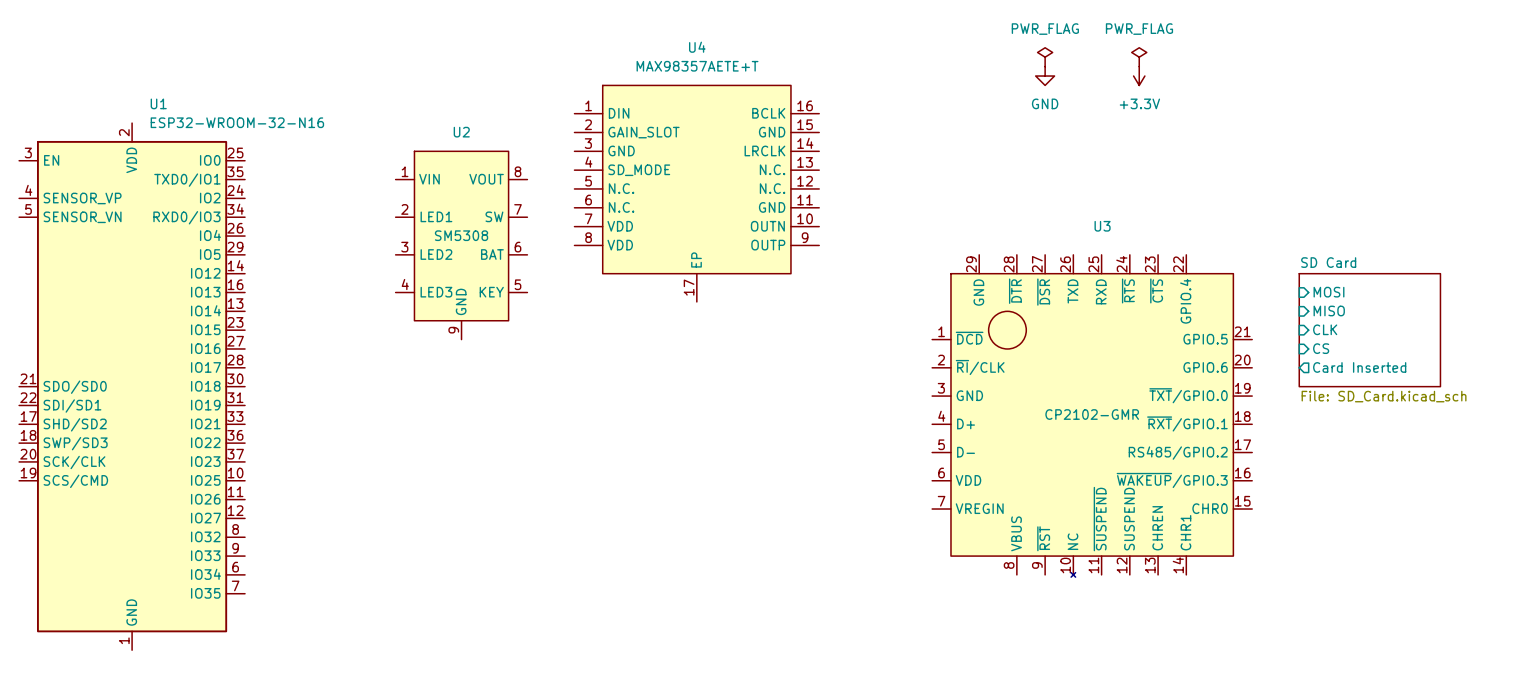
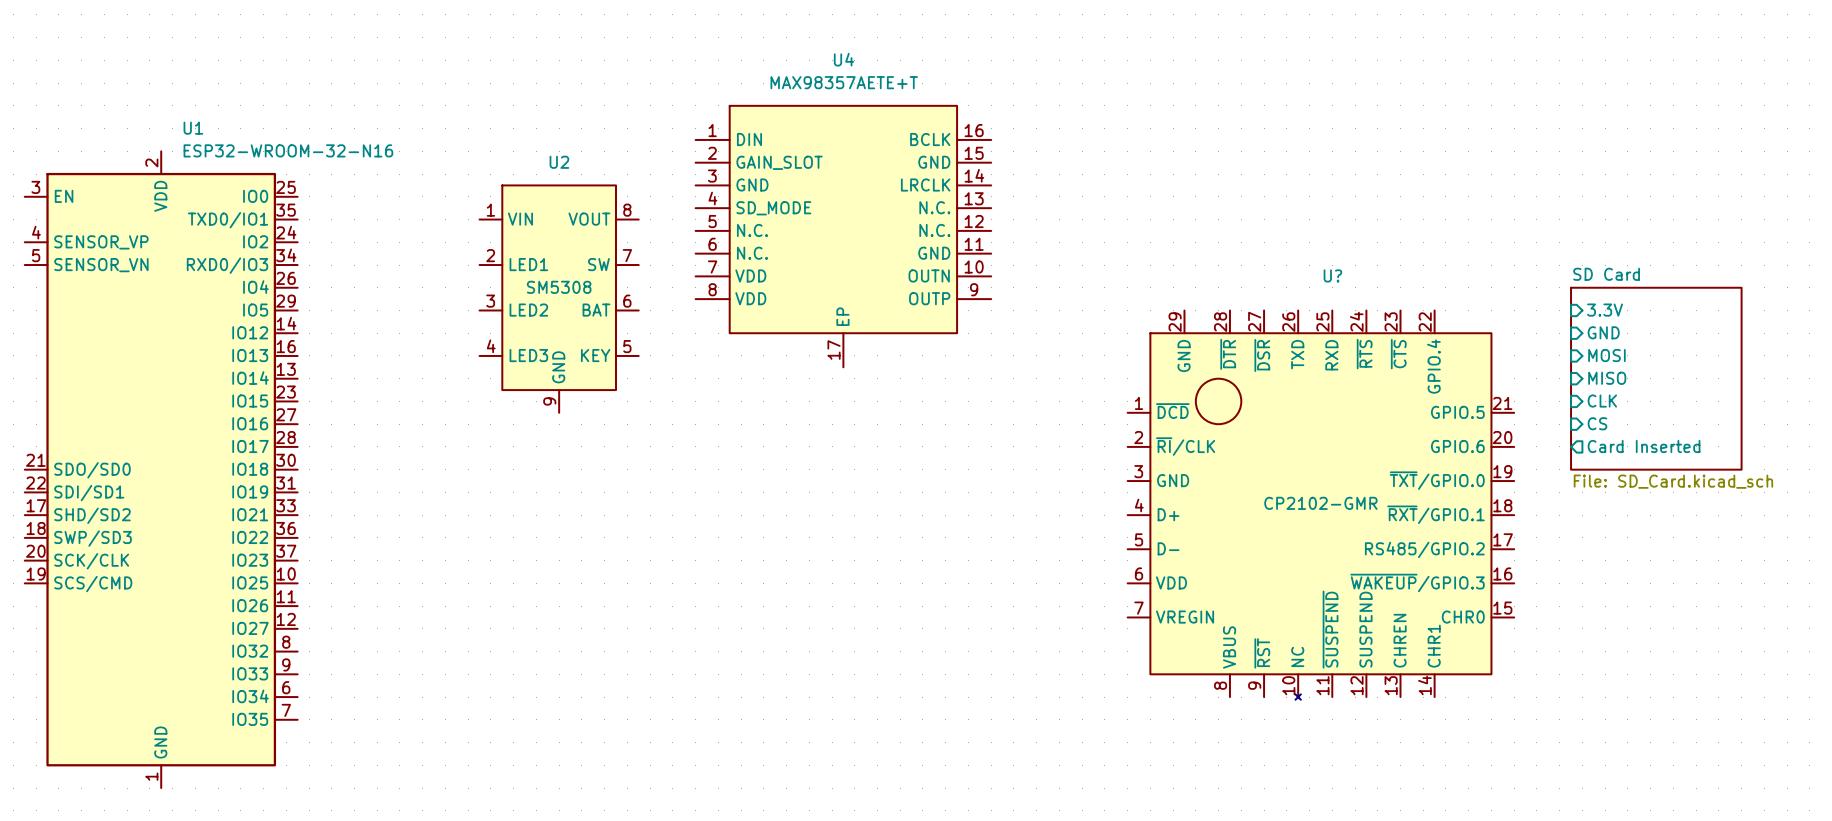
power symbol: PWR_FLAG (1045, 57) -> none
power symbol: PWR_FLAG (1139, 57) -> none
power symbol: GND (1045, 76) -> none
power symbol: +3.3V (1139, 76) -> none
U3 name: U3 (1102, 226) -> U? (1332, 275)
sheet pin: none -> 3.3V (1605, 310)
sheet pin: none -> GND (1603, 332)
sheet SD Card: none -> File: SD_Card.kicad_sch (1656, 378)
sheet SD Card: File: SD_Card.kicad_sch (1369, 330) -> none

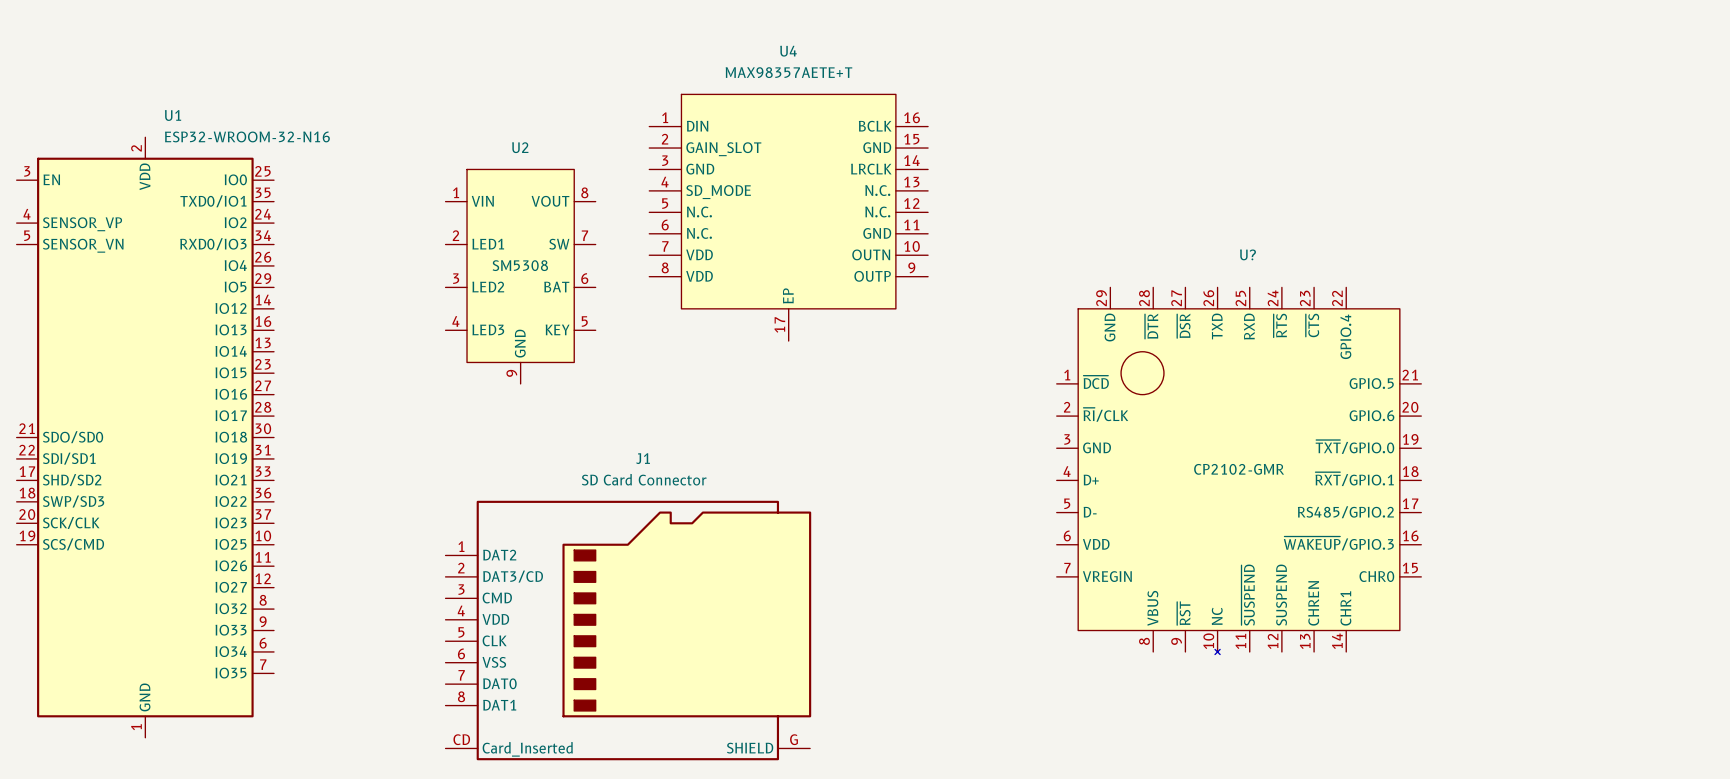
sheet pin: 3.3V (1605, 310) -> none
sheet pin: GND (1603, 332) -> none
sheet pin: MOSI (1606, 355) -> none
sheet pin: MISO (1607, 378) -> none
sheet SD Card: File: SD_Card.kicad_sch (1656, 378) -> none
sheet pin: CLK (1602, 401) -> none
sheet pin: CS (1597, 423) -> none
sheet pin: Card Inserted (1644, 446) -> none
J1: none -> SD Card Connector (628, 630)

